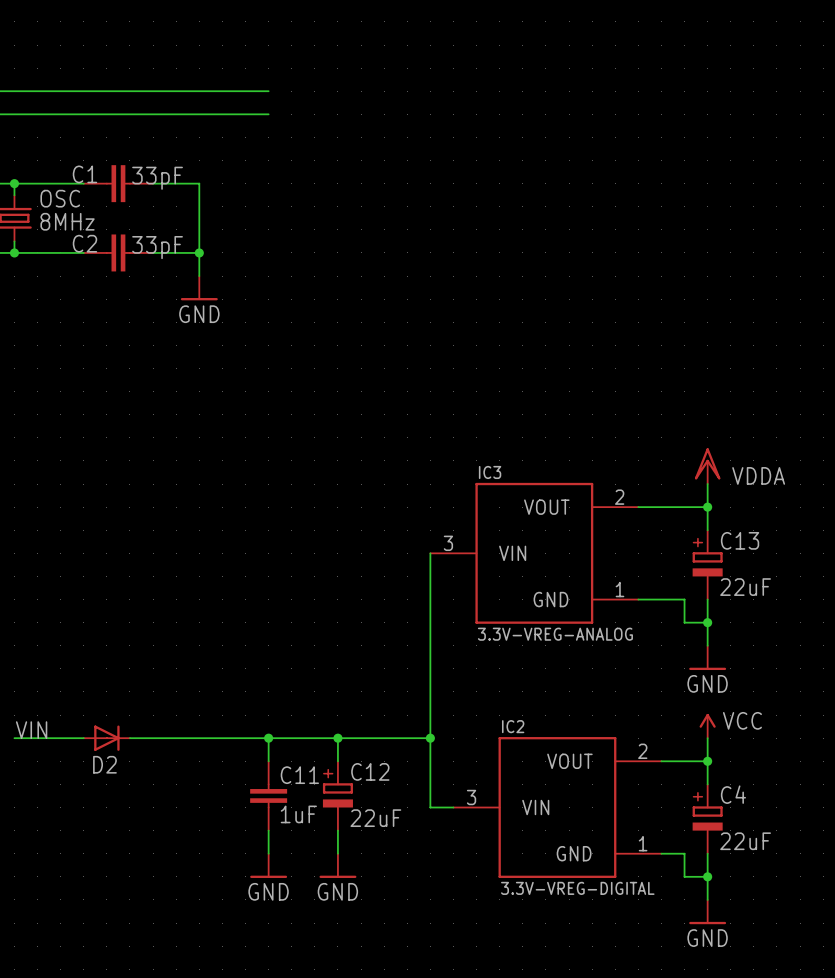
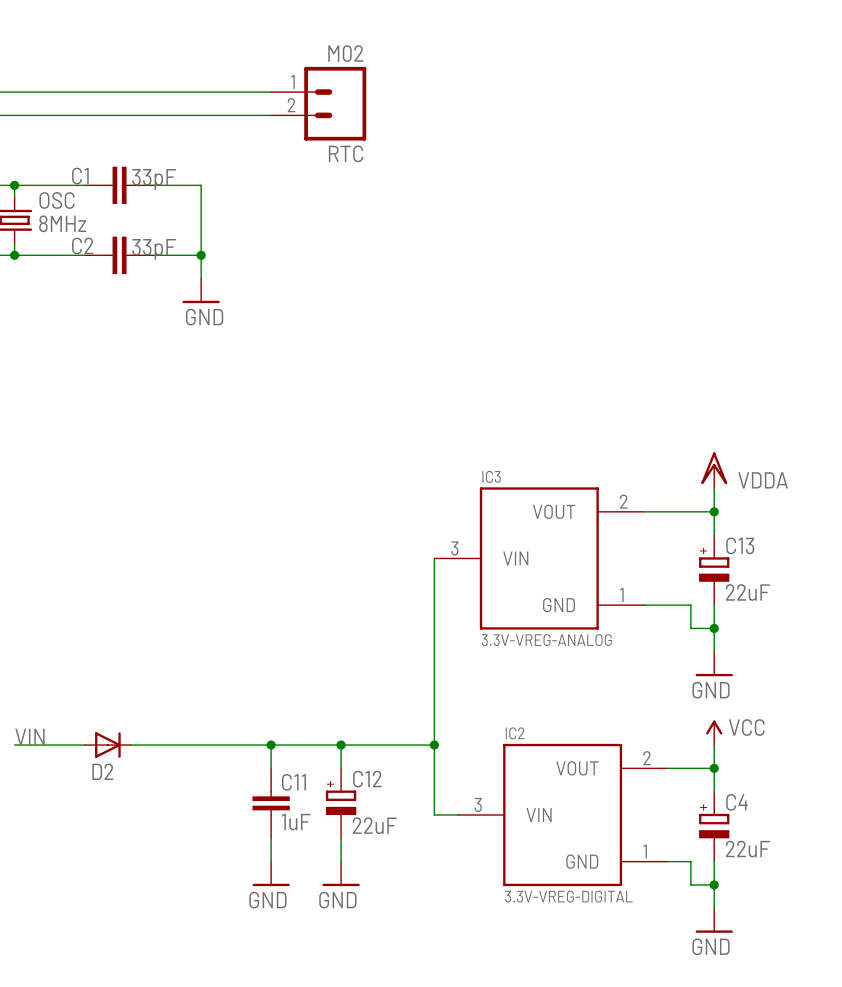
RTC: none -> M02 (318, 103)

